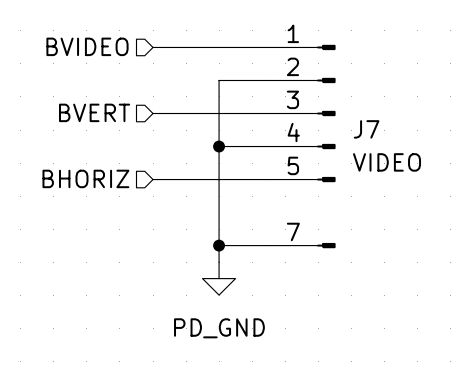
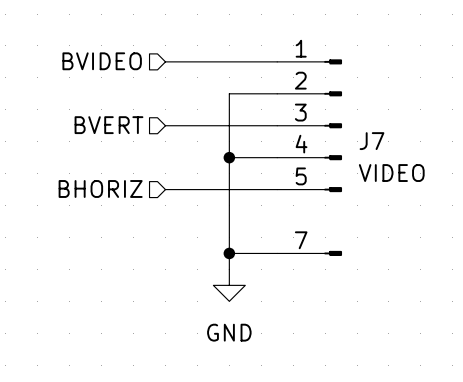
power symbol: PD_GND (219, 278) -> GND (229, 285)

